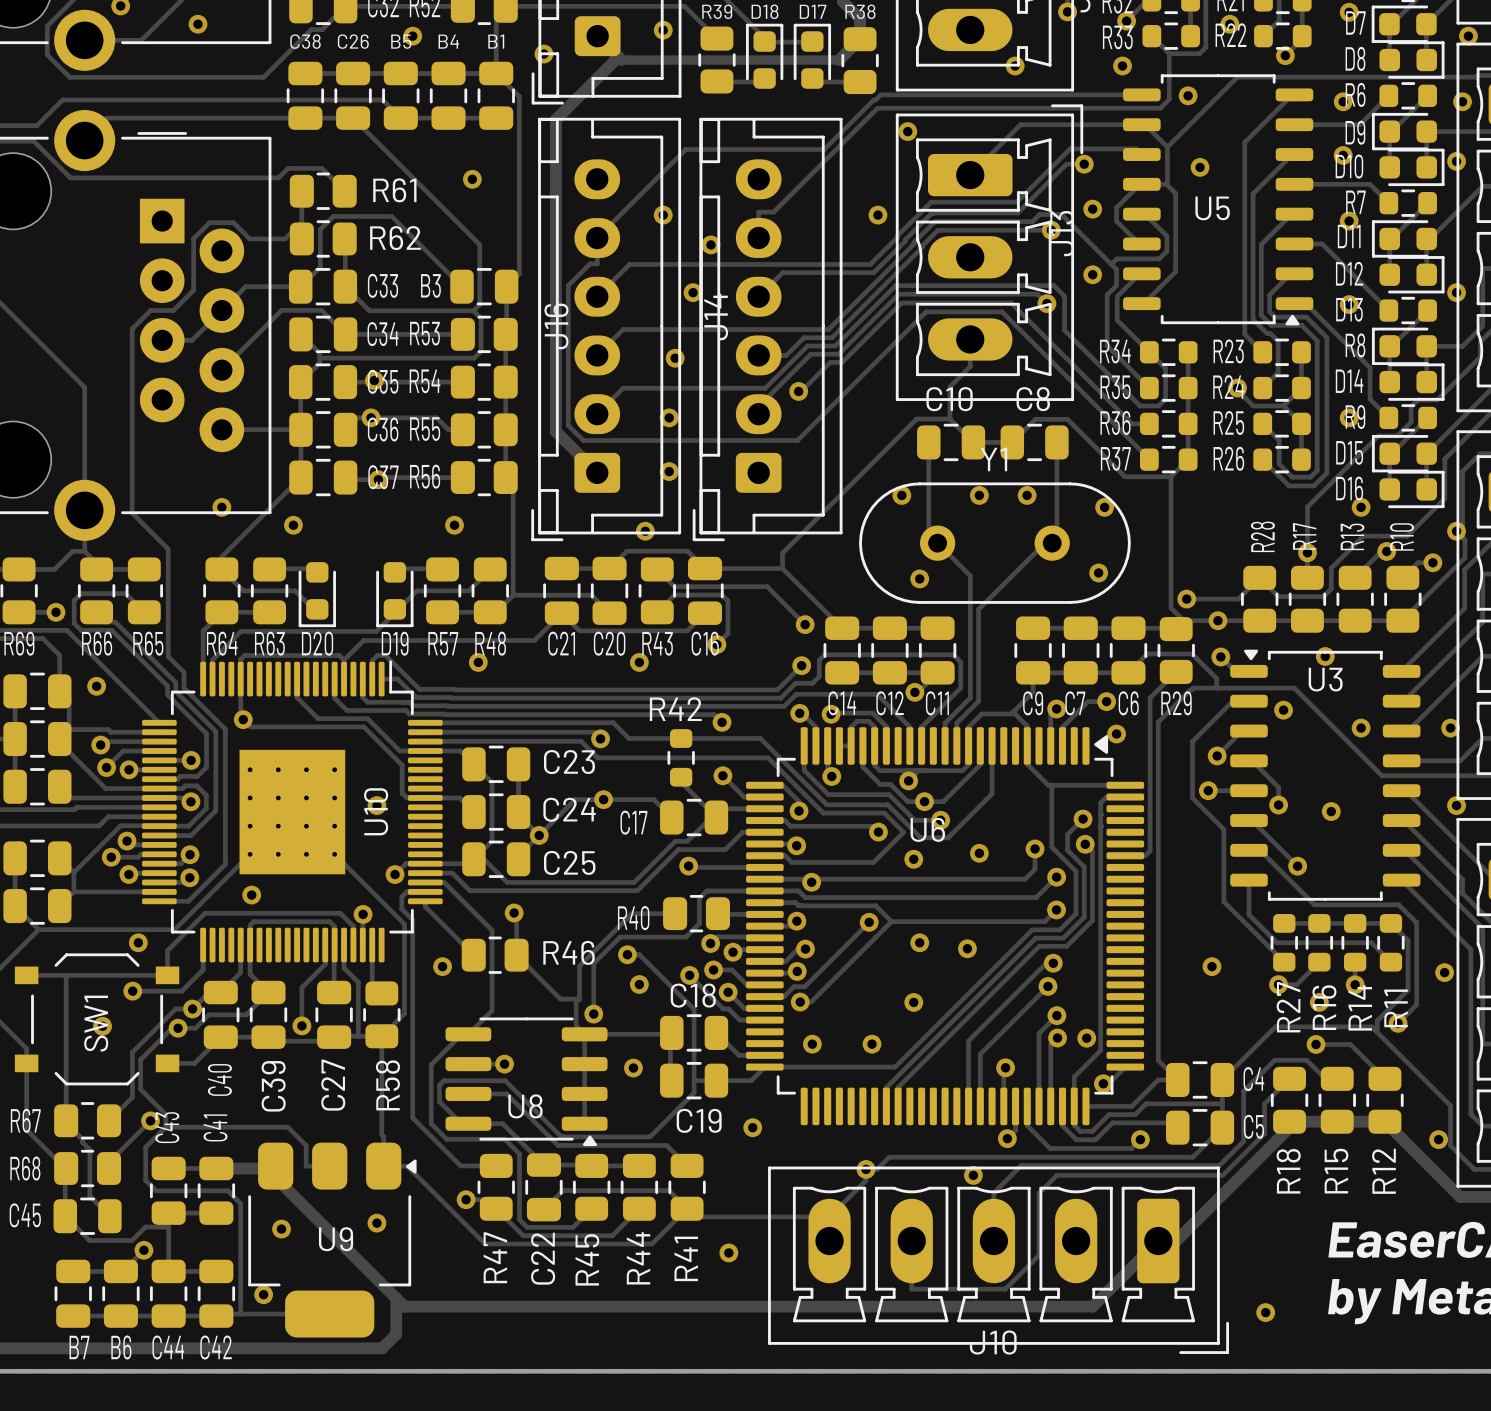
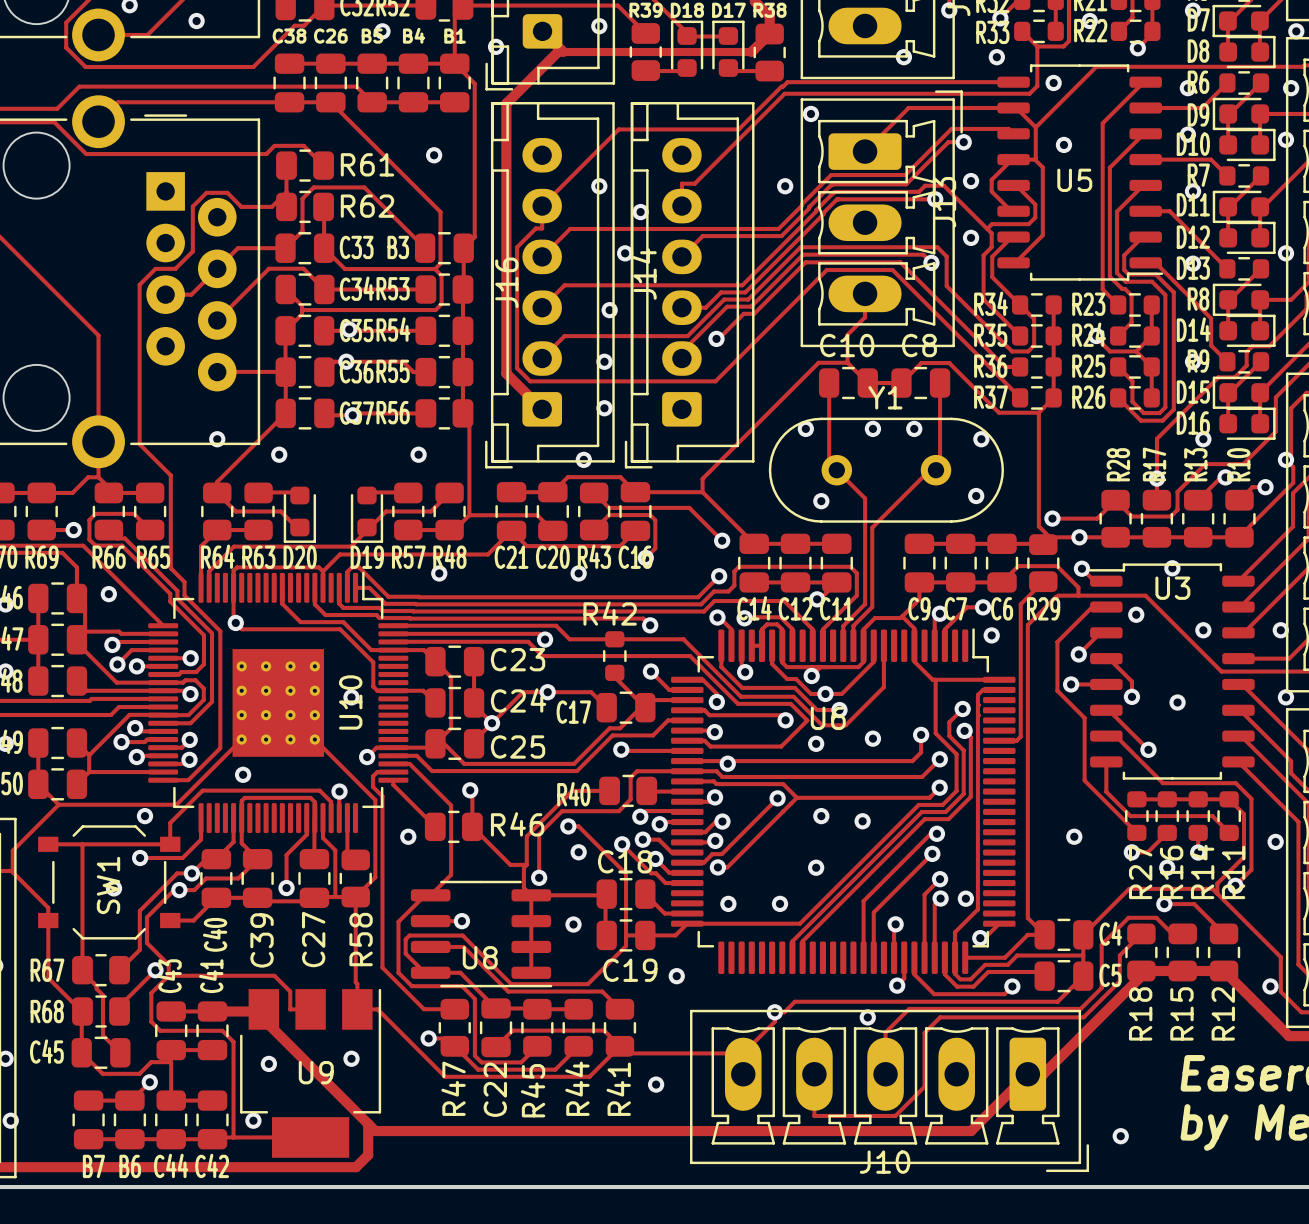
U5 footprint: [1123, 74, 1314, 326] -> [997, 64, 1164, 281]
U3 footprint: [1230, 649, 1421, 901] -> [1088, 563, 1255, 780]
U6 footprint: [746, 727, 1145, 1126] -> [671, 628, 1016, 975]
U8 footprint: [445, 1017, 608, 1147] -> [410, 880, 553, 988]
U9 footprint: [248, 1142, 417, 1338] -> [240, 988, 382, 1158]

